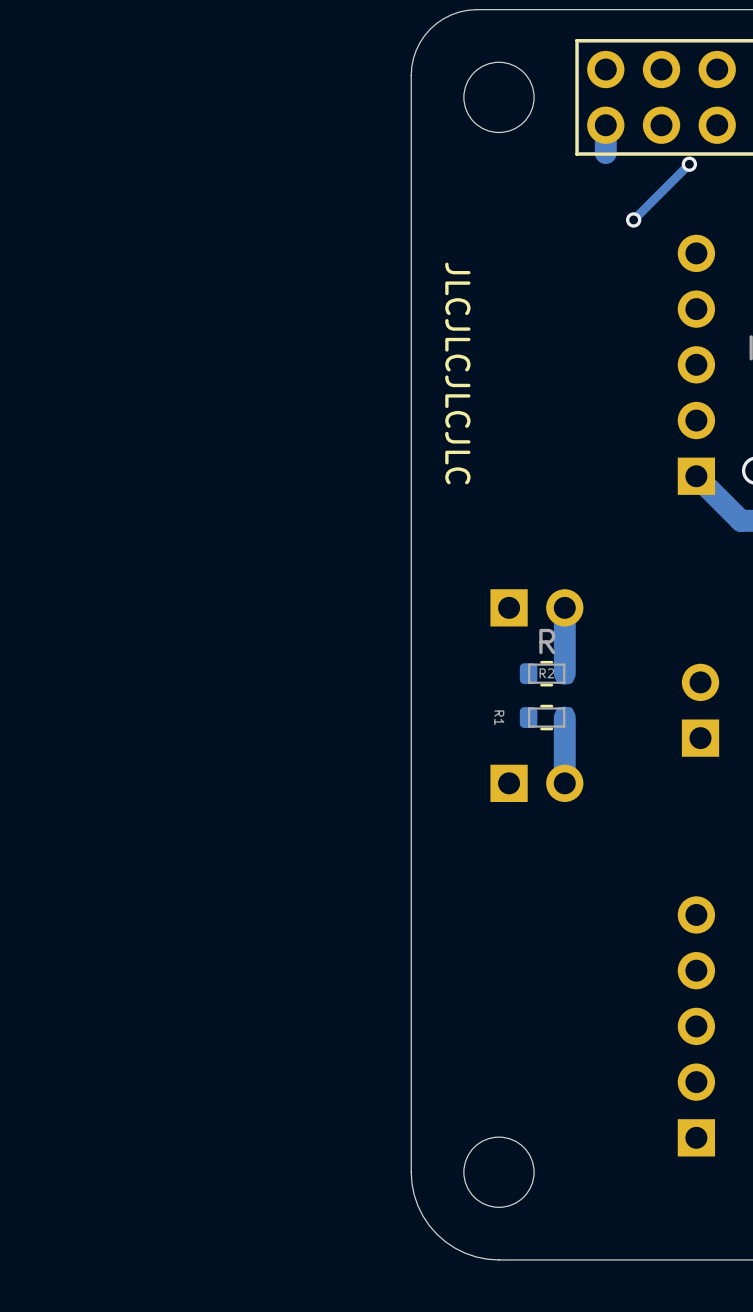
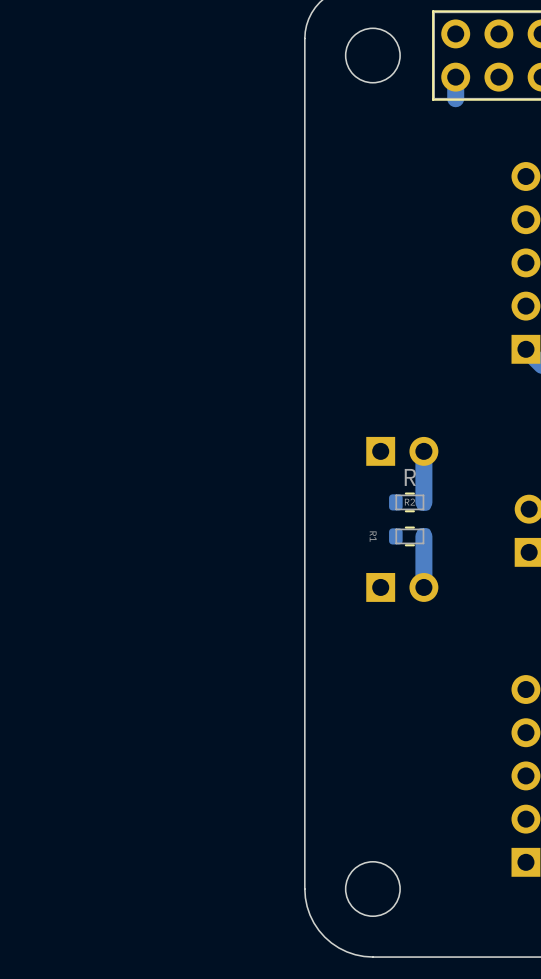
track: (689, 164) (633, 219) -> none
via: (689, 164) -> none
via: (633, 219) -> none
text: JLCJLCJLCJLC (457, 373) -> none

